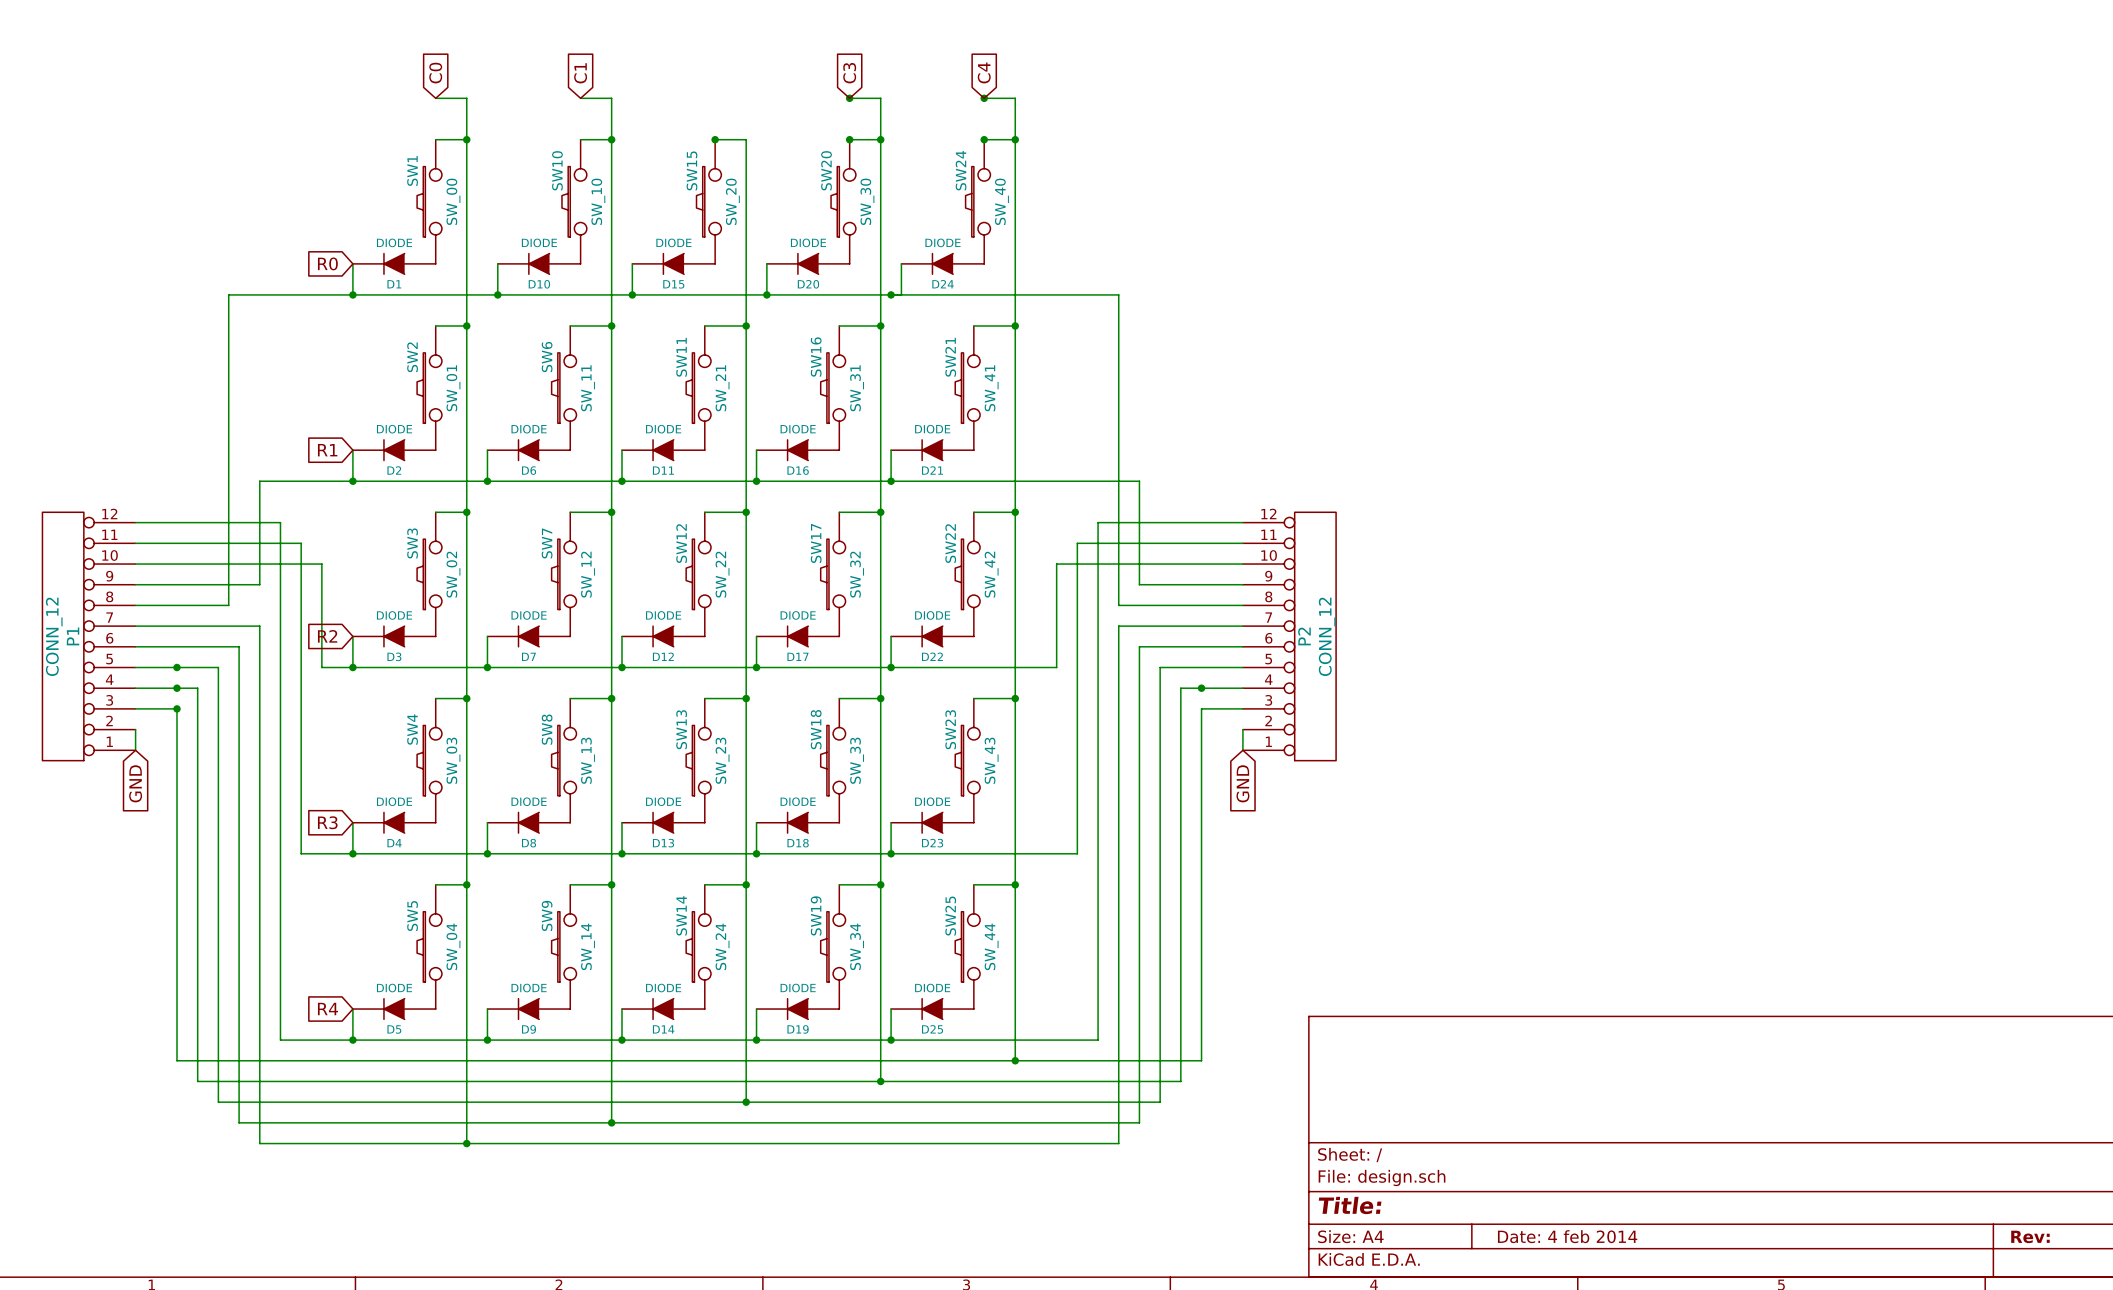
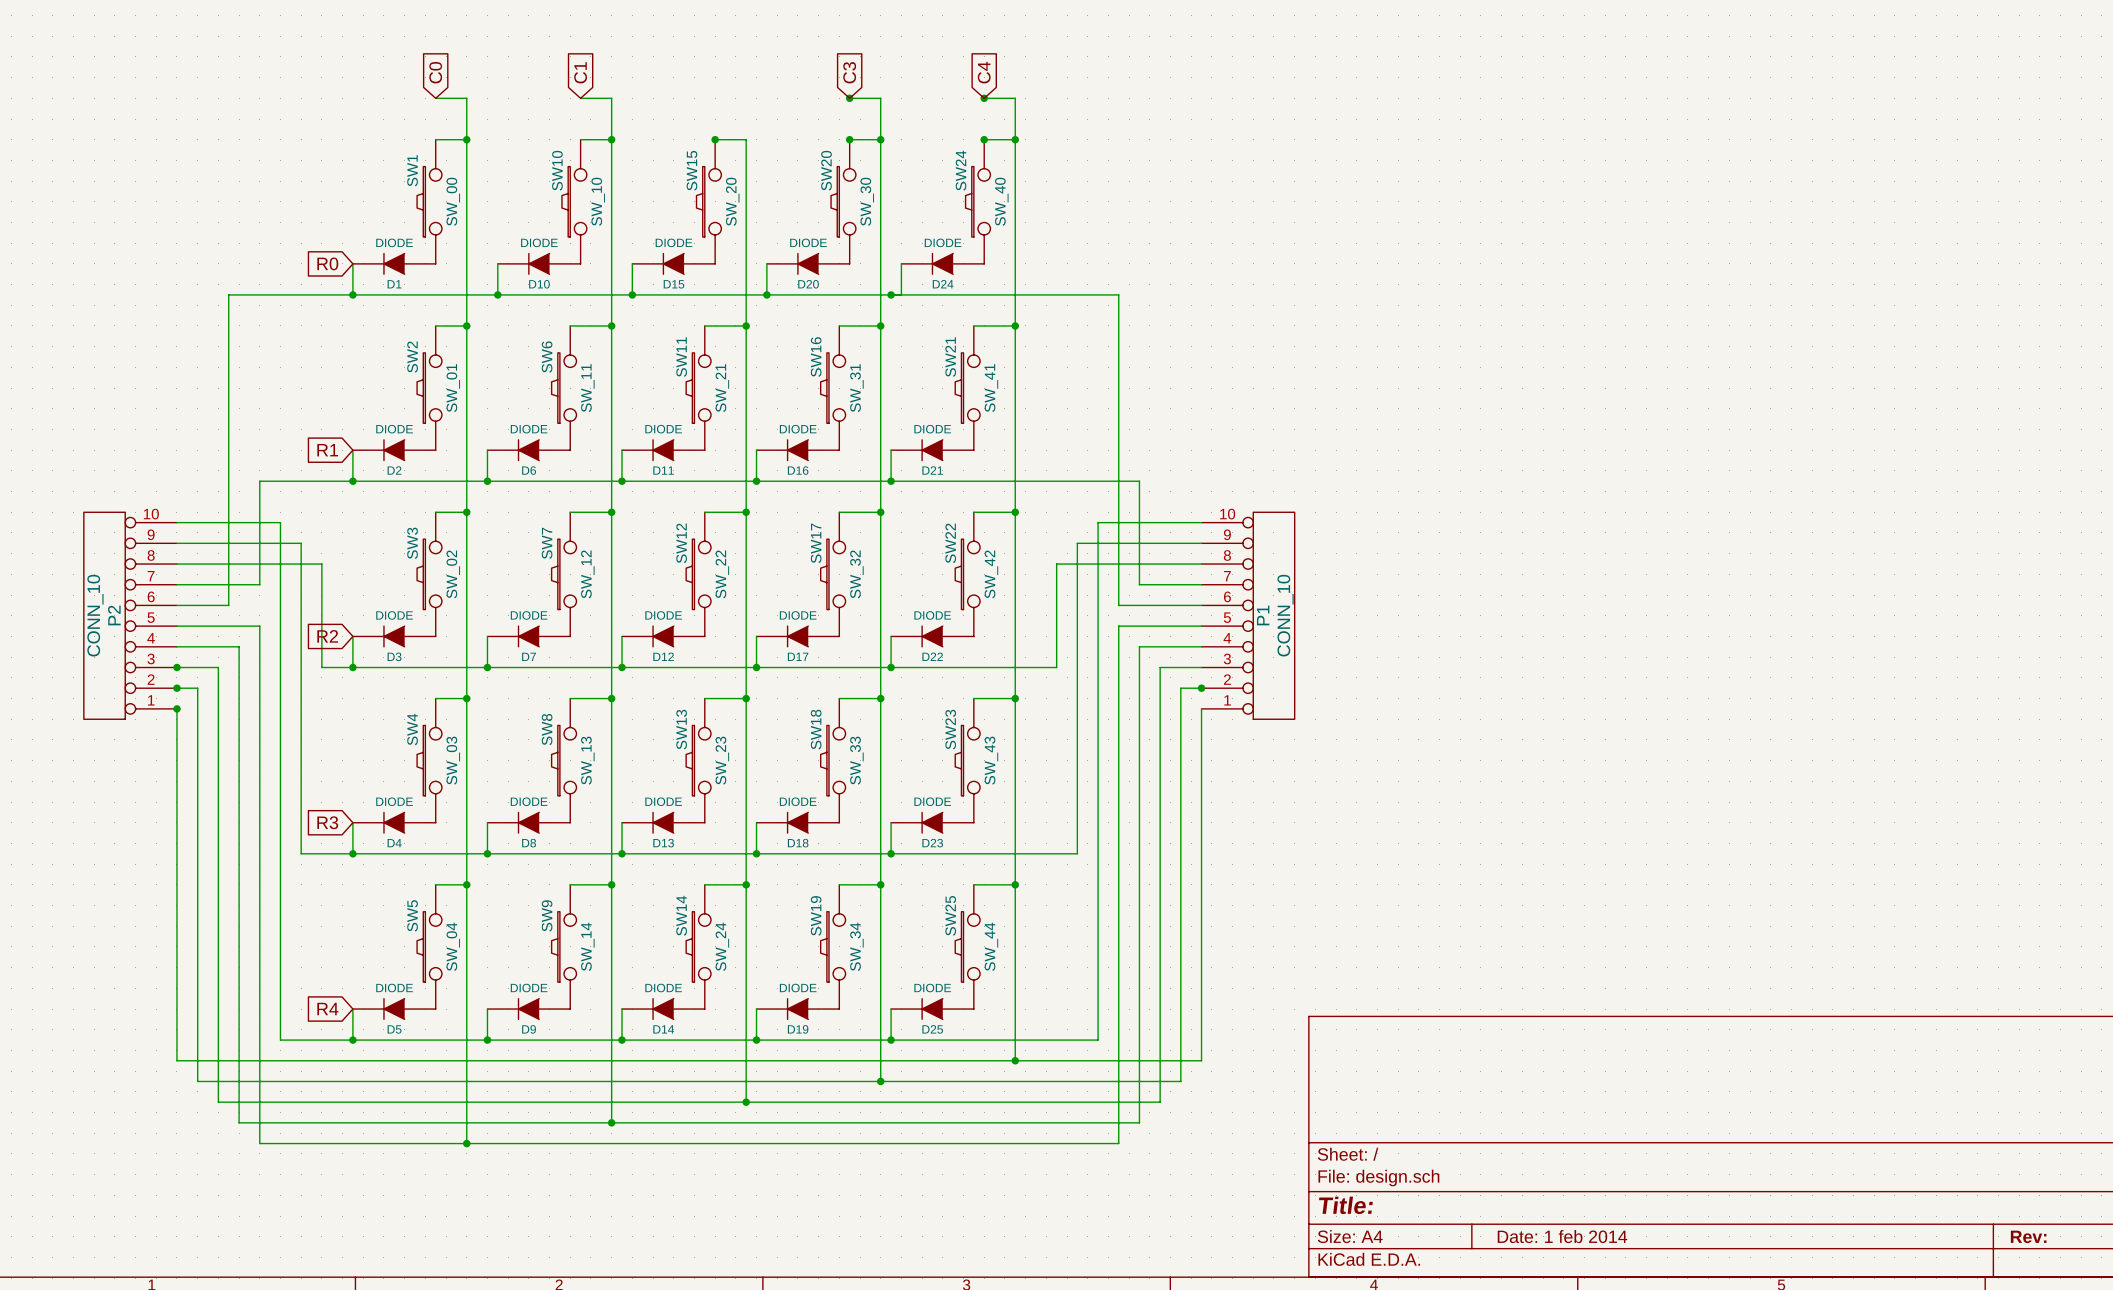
P1 symbol: [42, 512, 136, 761] -> [1201, 512, 1295, 720]
P2 symbol: [1242, 512, 1337, 761] -> [83, 512, 177, 720]
P1 value: CONN_12 (54, 636) -> CONN_10 (1285, 615)
P1 name position: P1 (73, 636) -> P1 (1263, 615)
P2 name position: P2 (1304, 636) -> P2 (114, 615)
P2 value: CONN_12 (1327, 636) -> CONN_10 (95, 615)
wire: (135, 729) (135, 750) -> none
wire: (1242, 729) (1242, 750) -> none
global label: GND (135, 783) -> none
global label: GND (1242, 783) -> none
title block: Date: 4 feb 2014 (1567, 1236) -> Date: 1 feb 2014 (1562, 1236)

